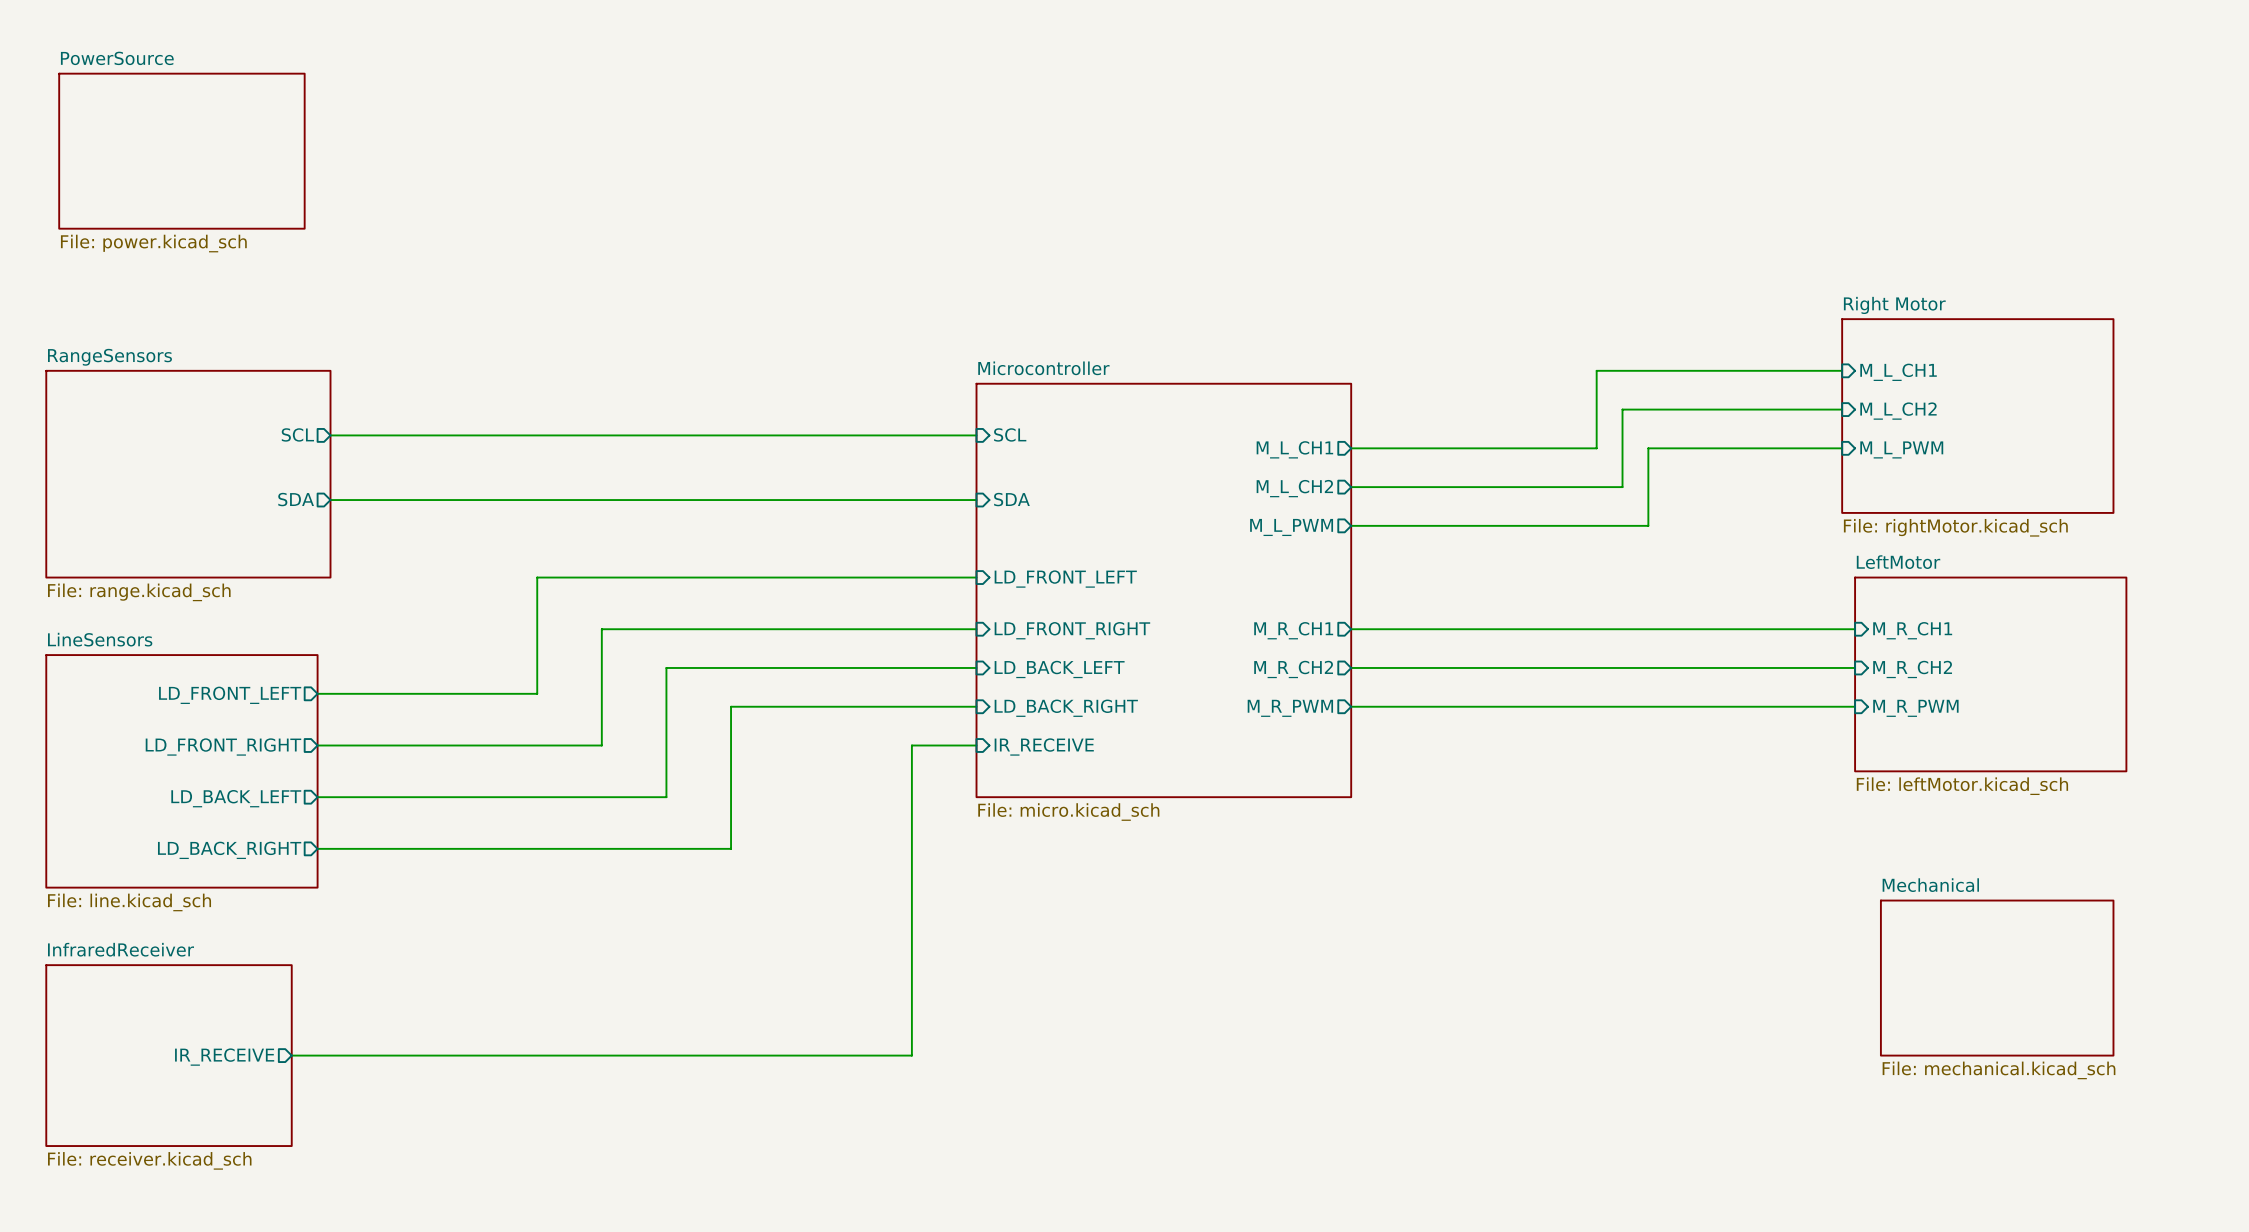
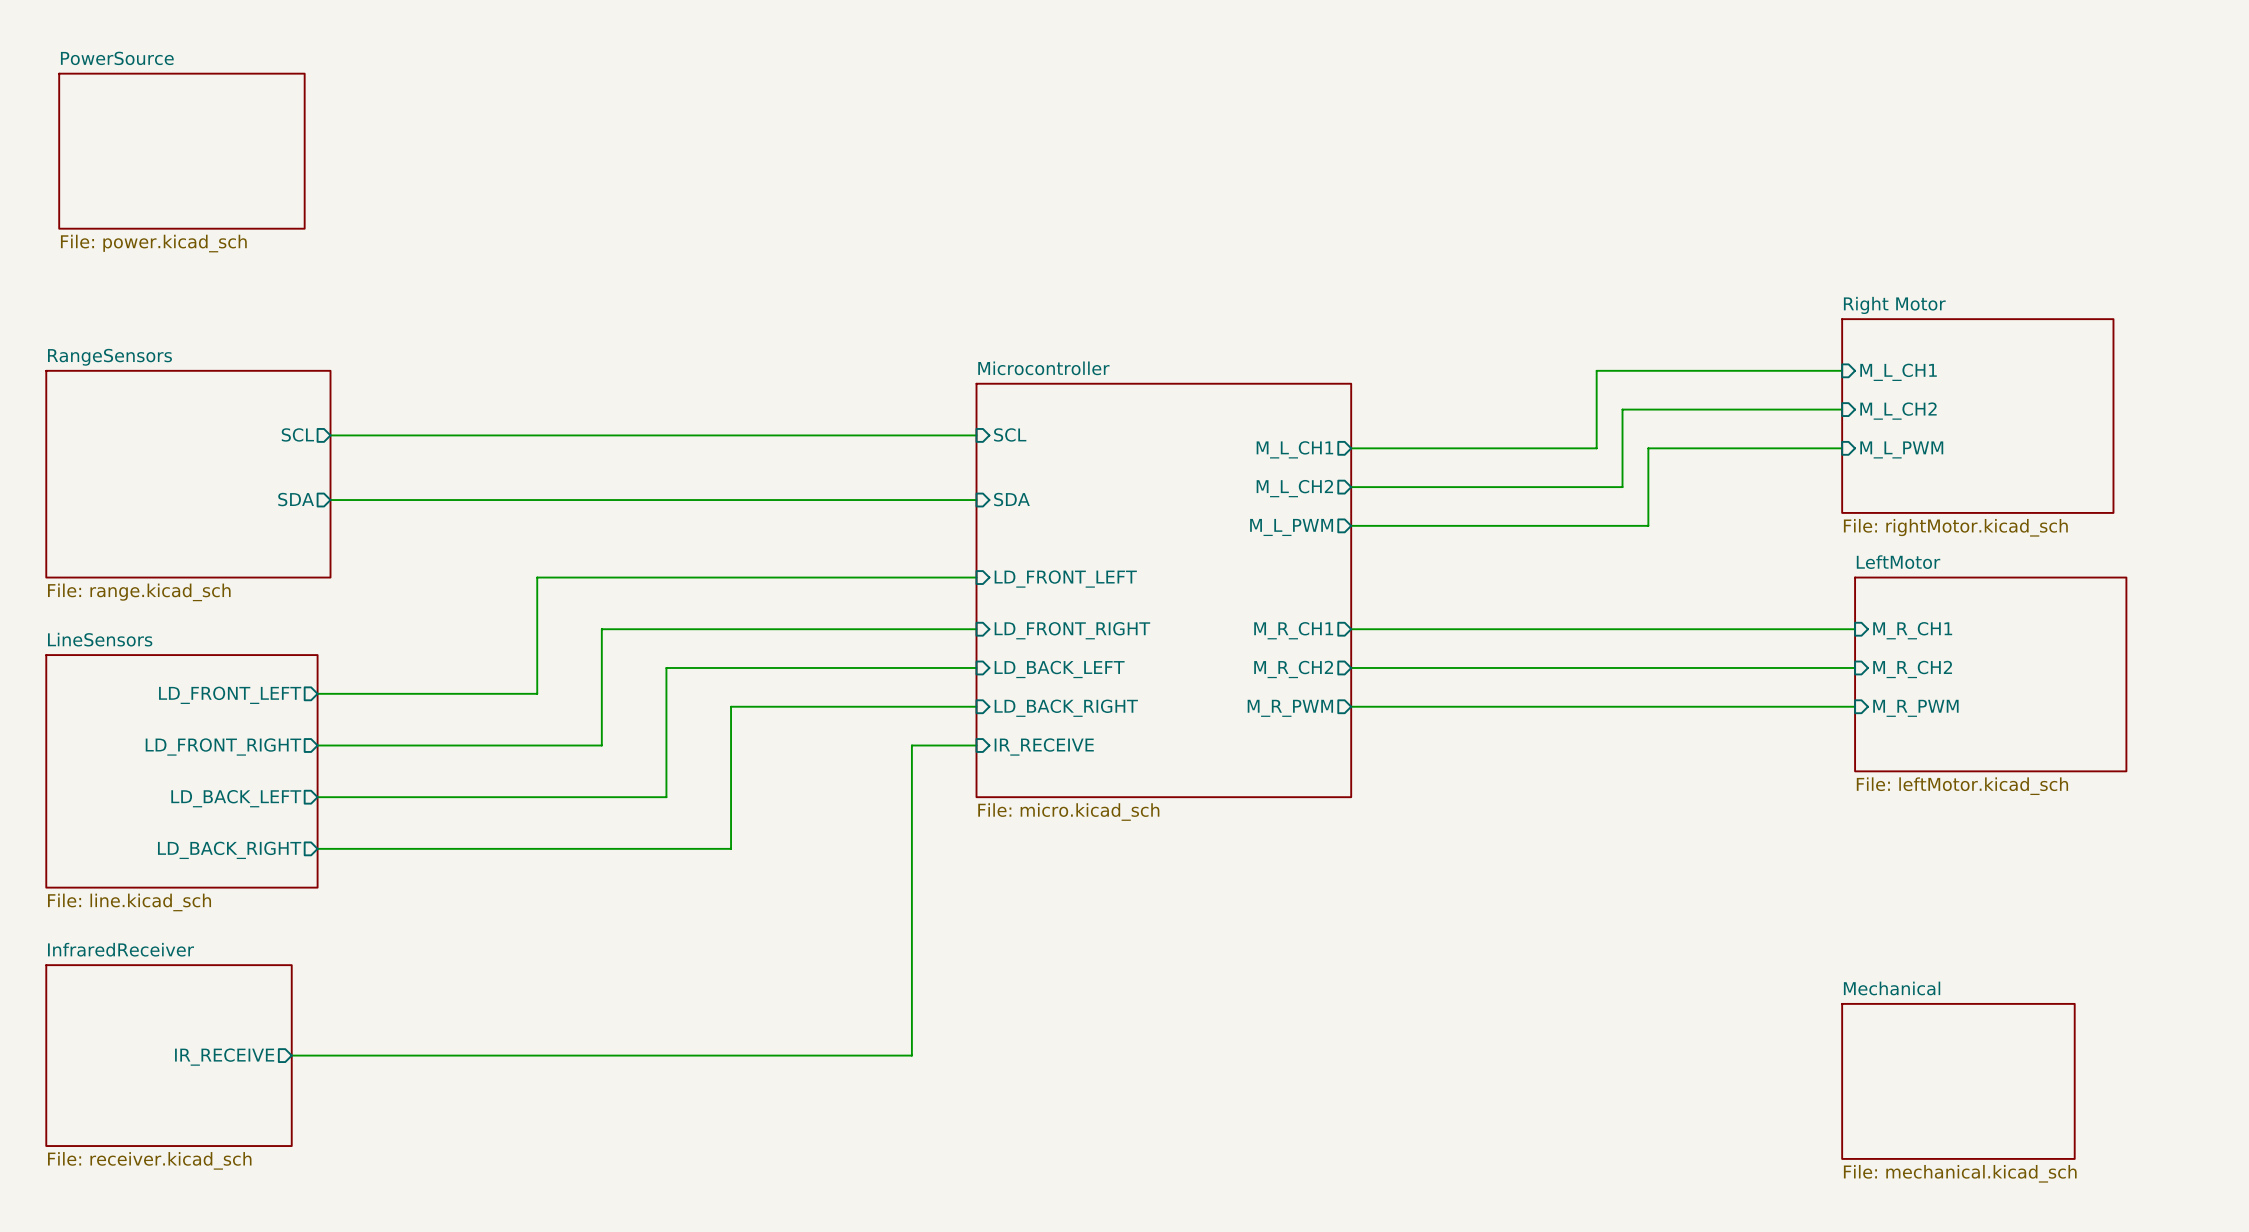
sheet Mechanical position: (1997, 978) -> (1958, 1081)

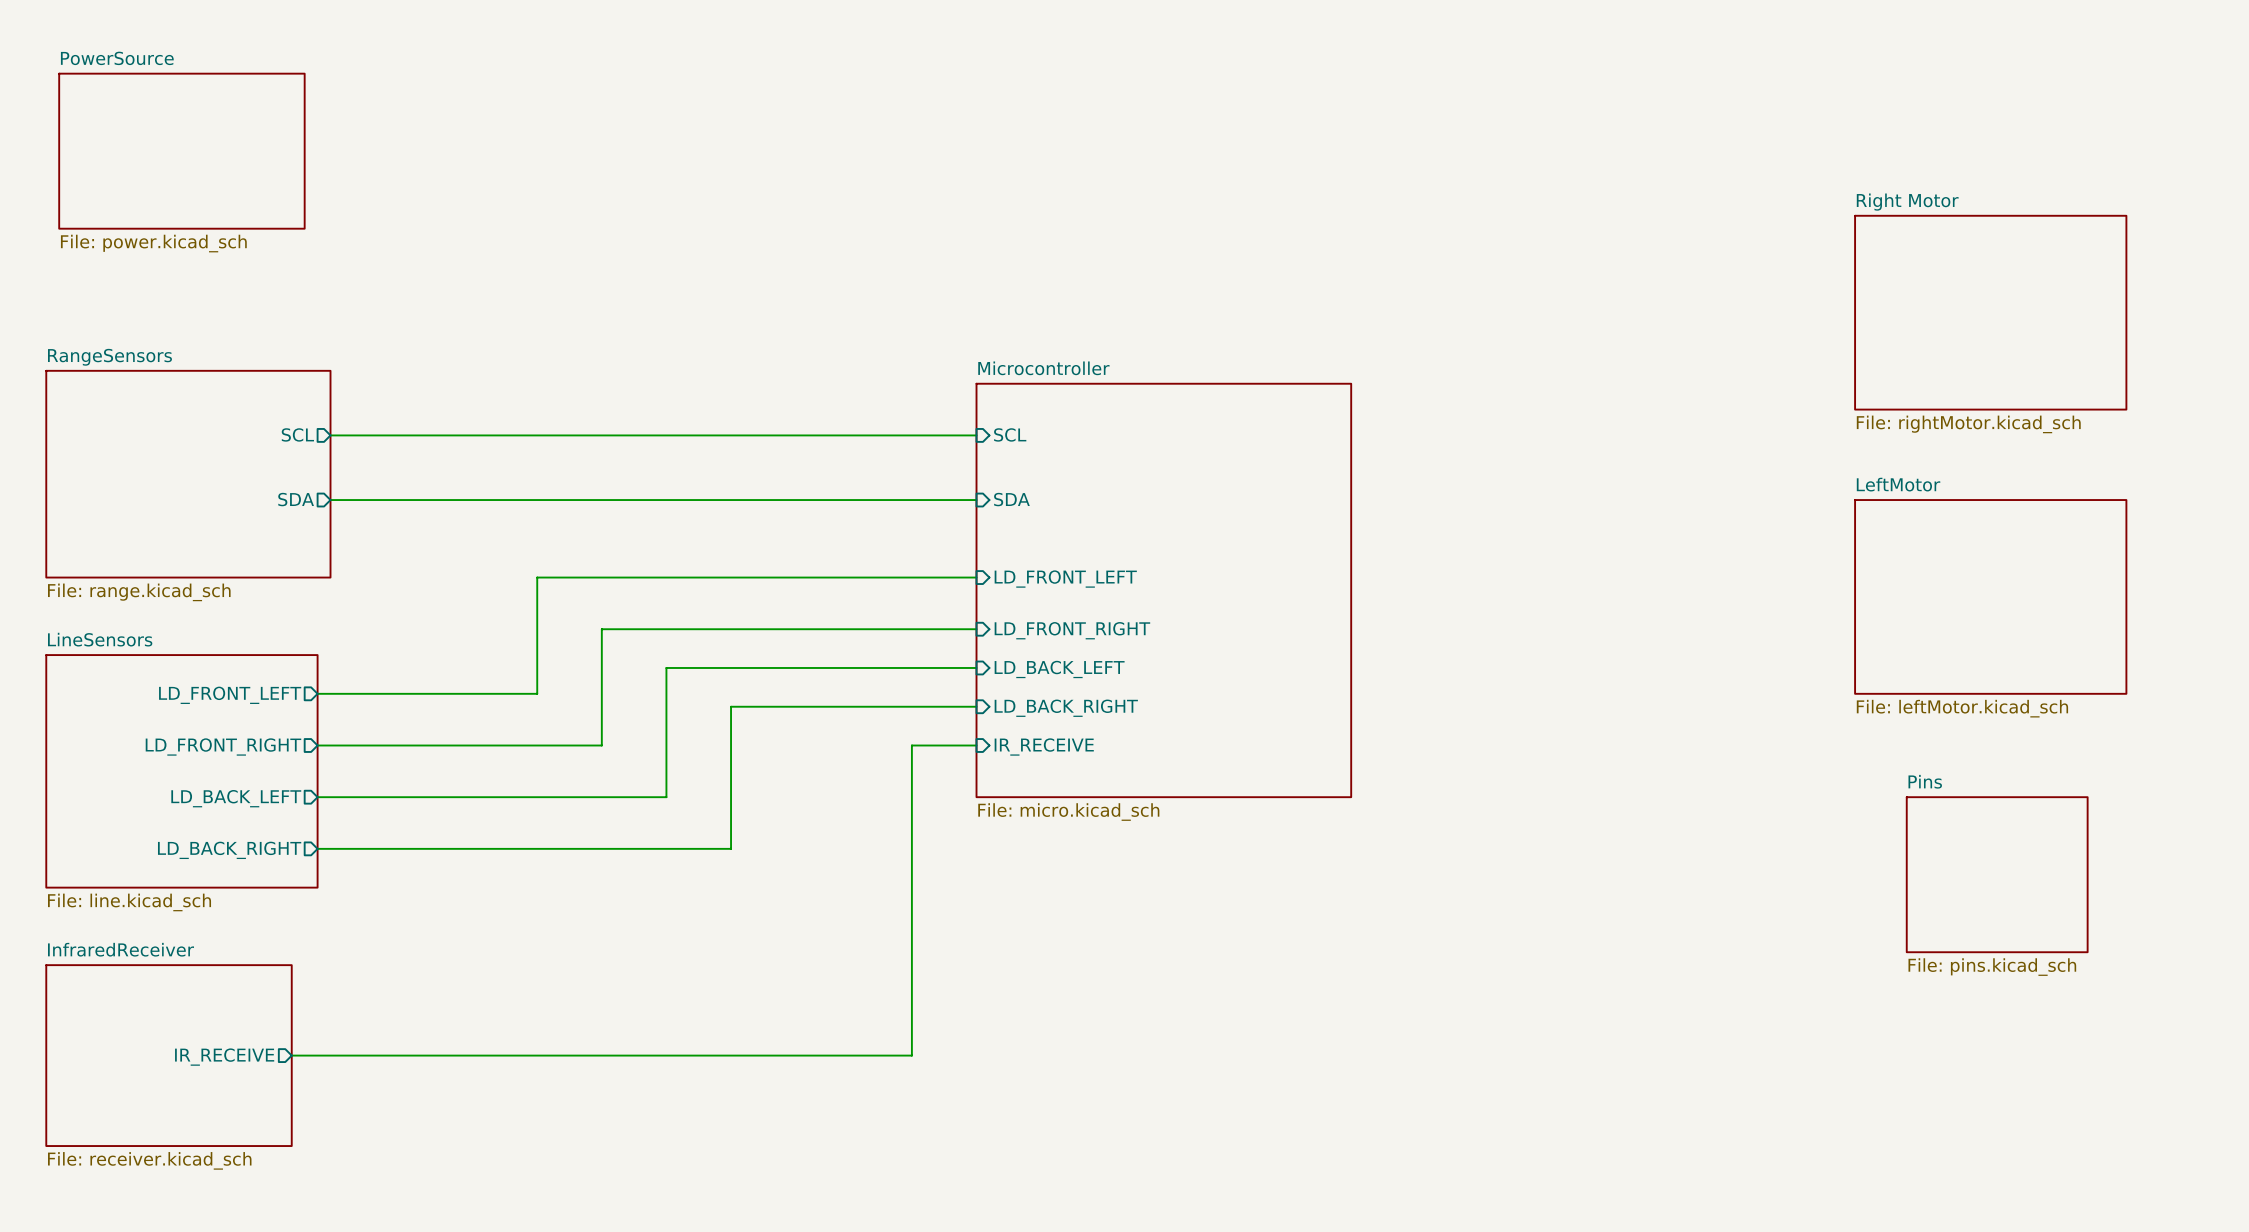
wire: (1842, 370) (1596, 370) (1596, 448) (1351, 448) -> none
sheet pin: M_L_CH1 (1898, 372) -> none
wire: (1842, 409) (1622, 409) (1622, 487) (1351, 487) -> none
sheet pin: M_L_CH2 (1898, 411) -> none
sheet Right Motor position: (1977, 416) -> (1990, 312)
wire: (1842, 448) (1648, 448) (1648, 525) (1351, 525) -> none
sheet pin: M_L_CH1 (1294, 449) -> none
sheet pin: M_L_PWM (1901, 449) -> none
sheet pin: M_L_CH2 (1294, 488) -> none
sheet pin: M_L_PWM (1291, 527) -> none
wire: (1351, 629) (1855, 629) -> none
sheet pin: M_R_CH1 (1293, 630) -> none
sheet pin: M_R_CH1 (1912, 630) -> none
wire: (1351, 667) (1855, 667) -> none
sheet pin: M_R_CH2 (1293, 669) -> none
sheet pin: M_R_CH2 (1912, 669) -> none
sheet LeftMotor position: (1990, 674) -> (1990, 596)
wire: (1351, 706) (1855, 706) -> none
sheet pin: M_R_PWM (1290, 708) -> none
sheet pin: M_R_PWM (1915, 708) -> none
sheet Pins: none -> File: pins.kicad_sch (1997, 874)
sheet Mechanical: File: mechanical.kicad_sch (1958, 1081) -> none

